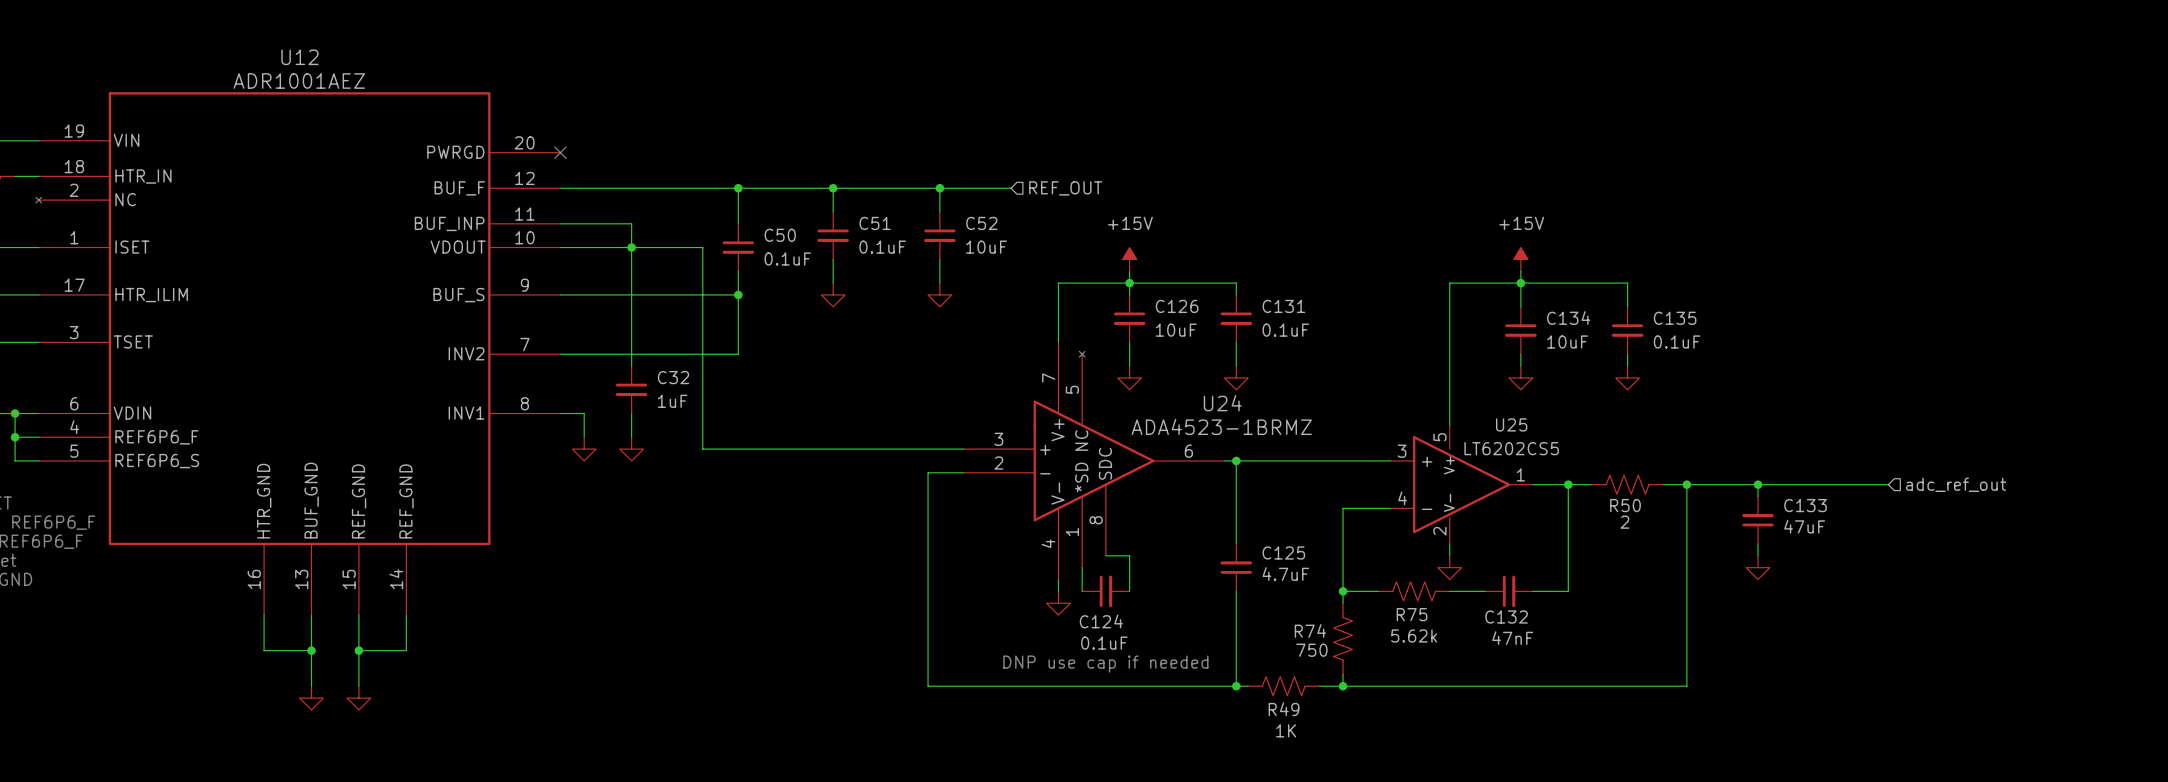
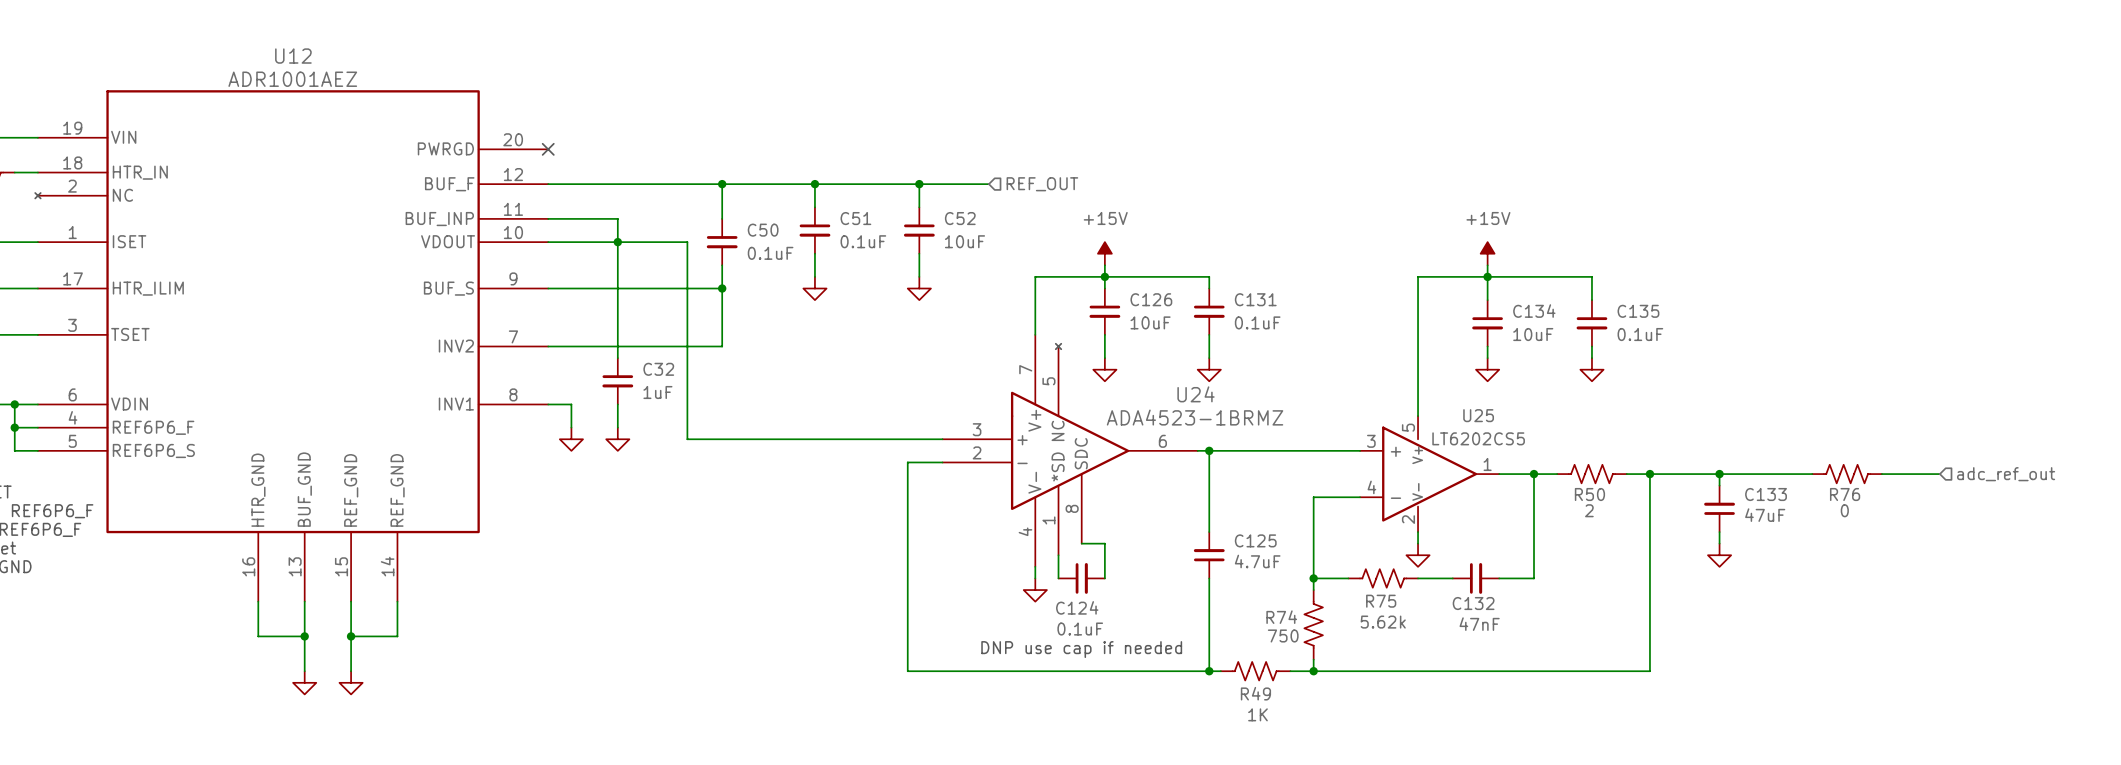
R76: none -> 0 (1847, 474)
wire: none -> (1881, 474) (1939, 474)
hierarchical label position: adc_ref_out (1956, 484) -> adc_ref_out (2006, 474)

